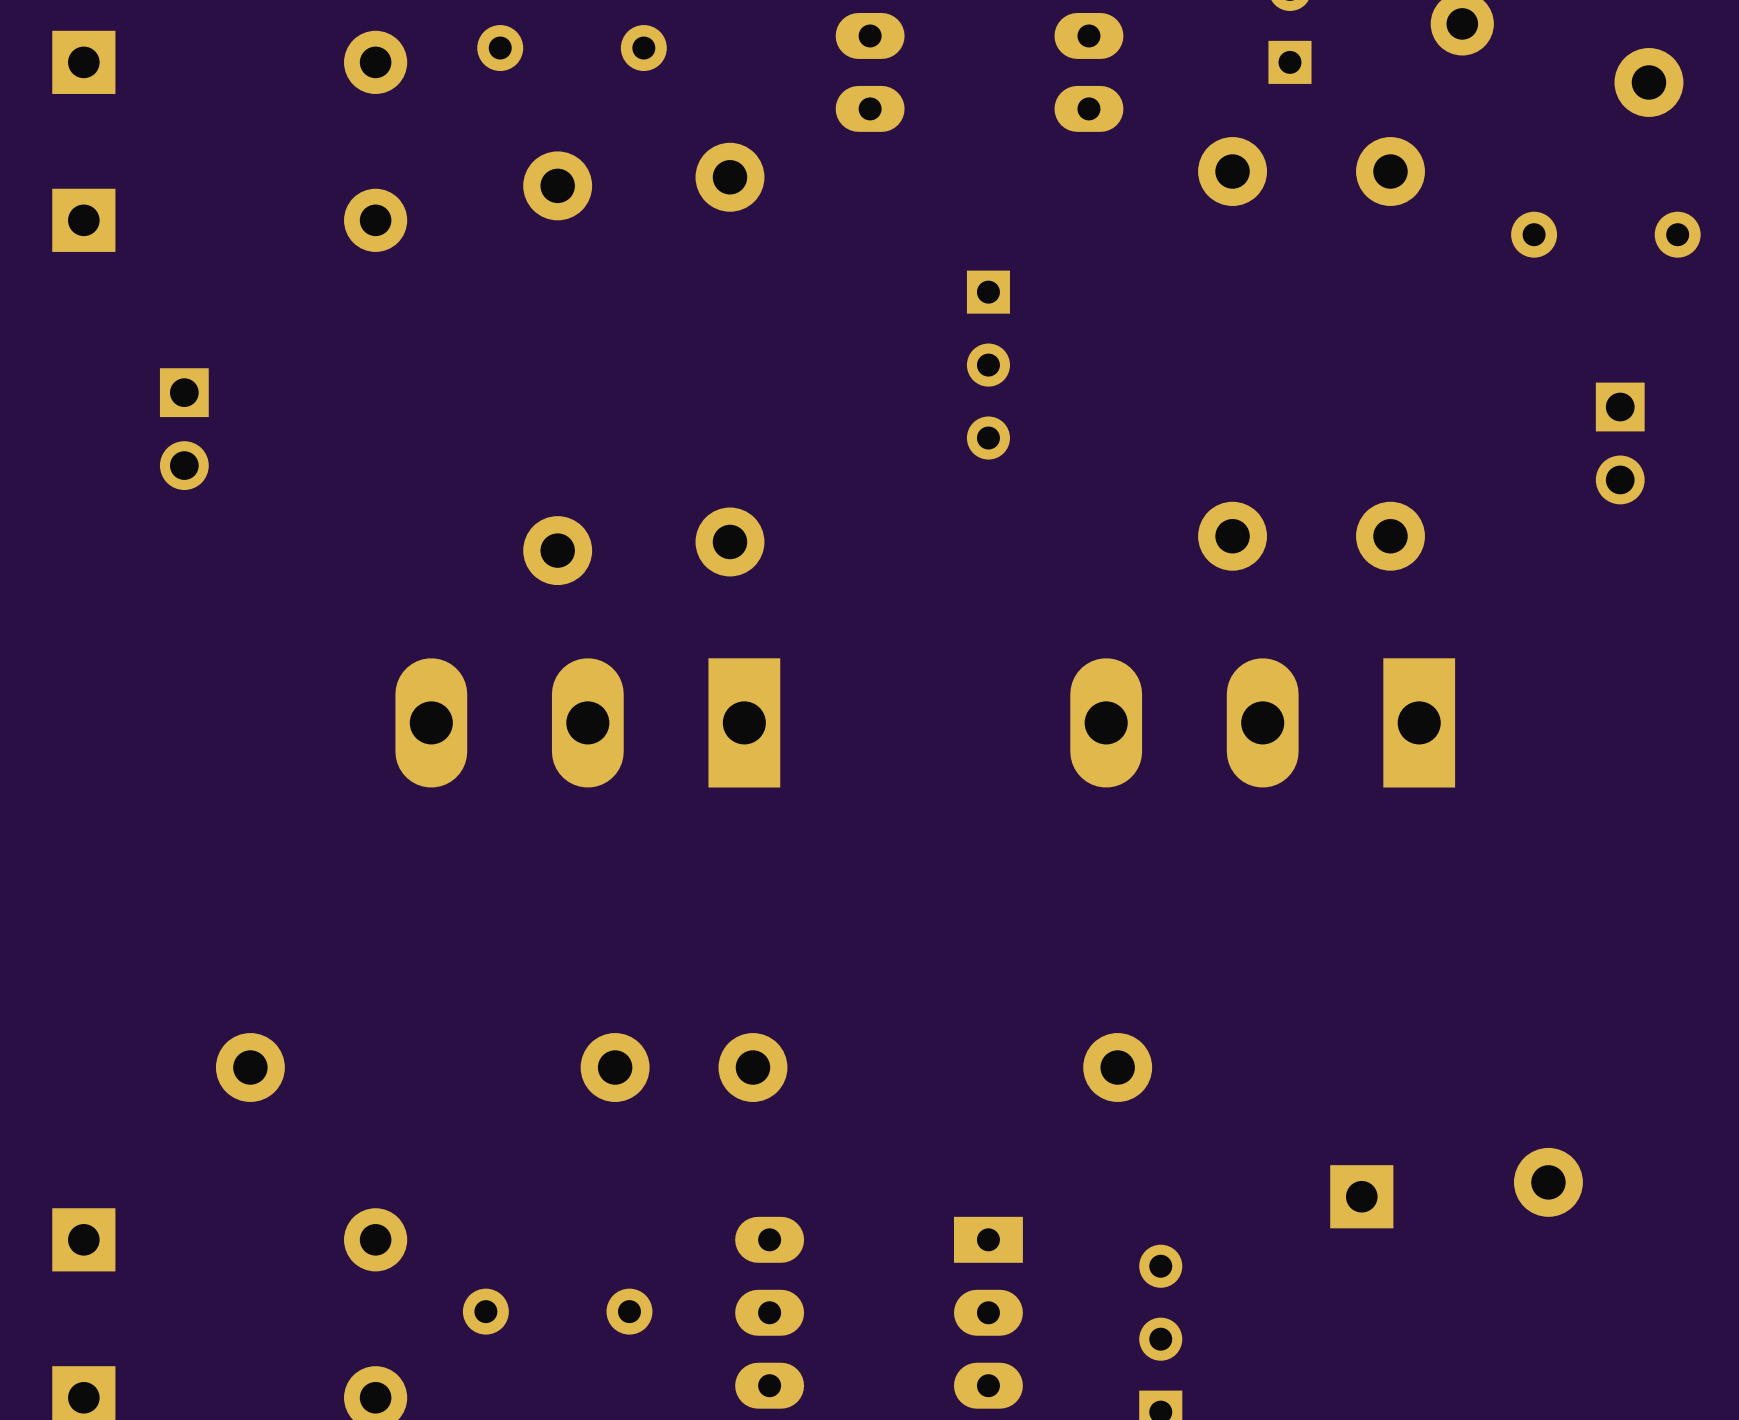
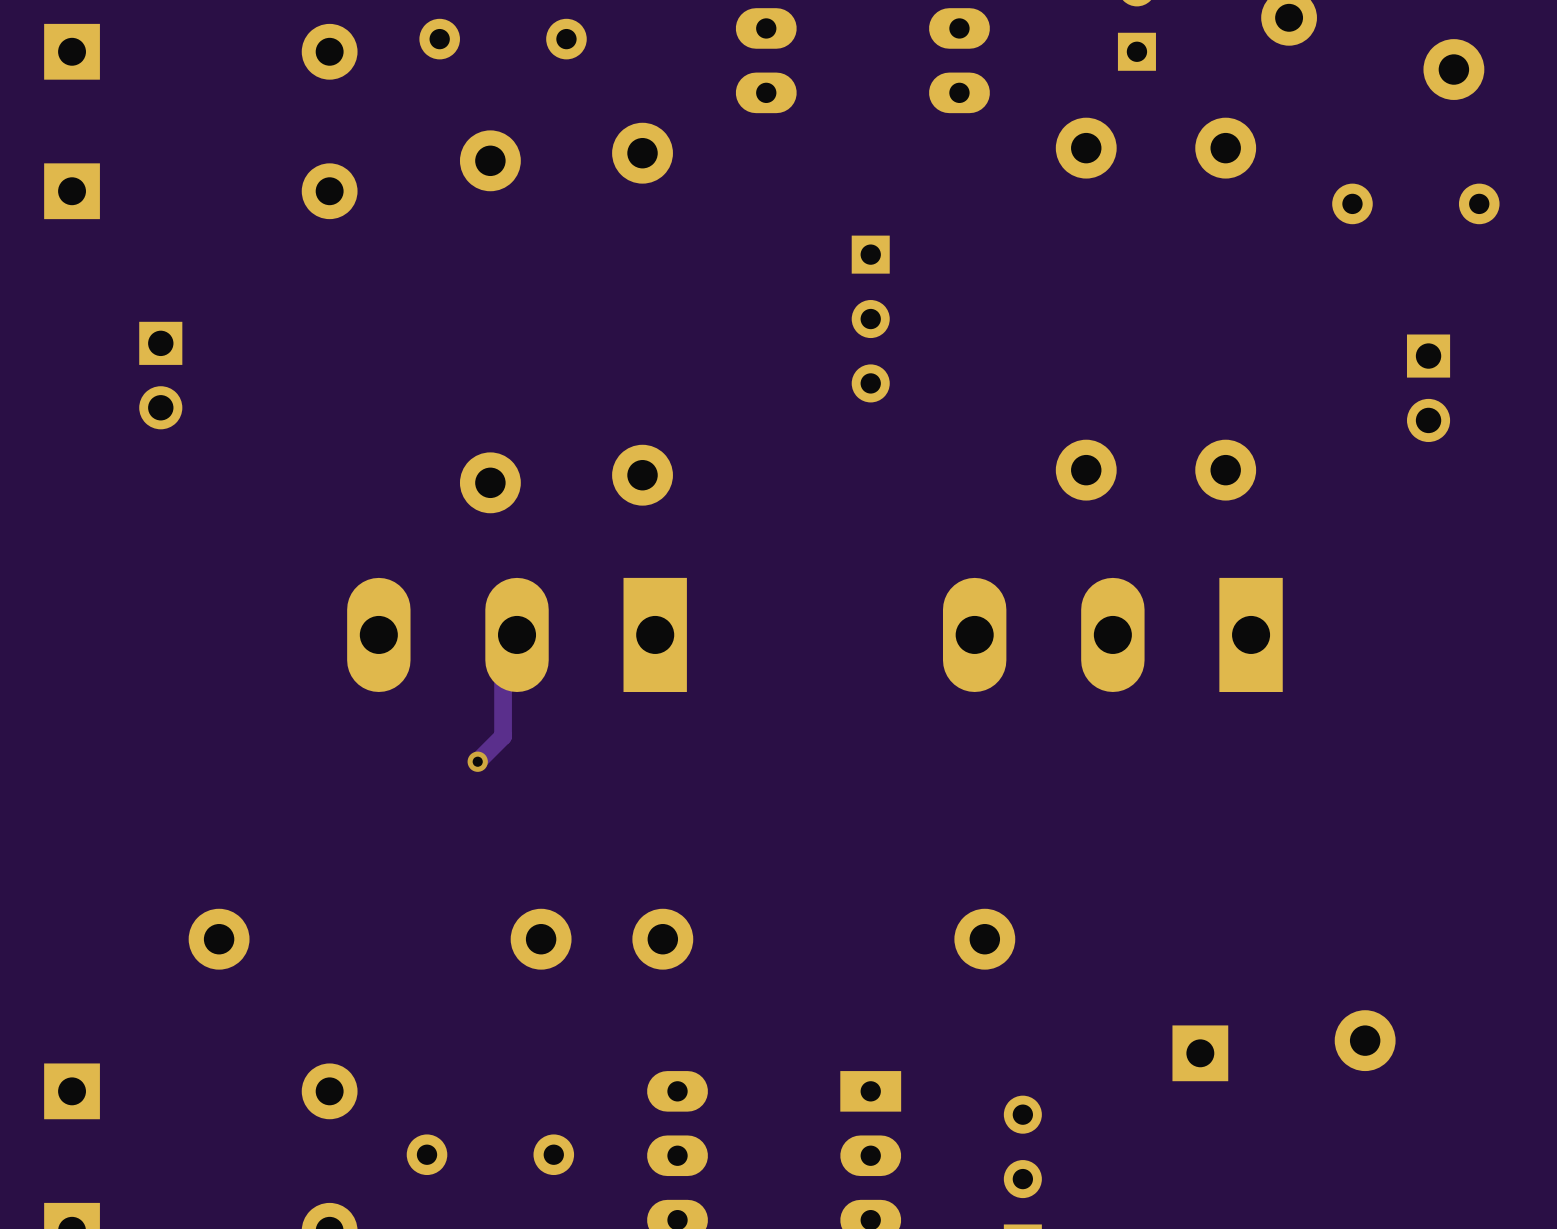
track: none -> (517, 634) (503, 648) (503, 736) (477, 761)
via: none -> (477, 761)

